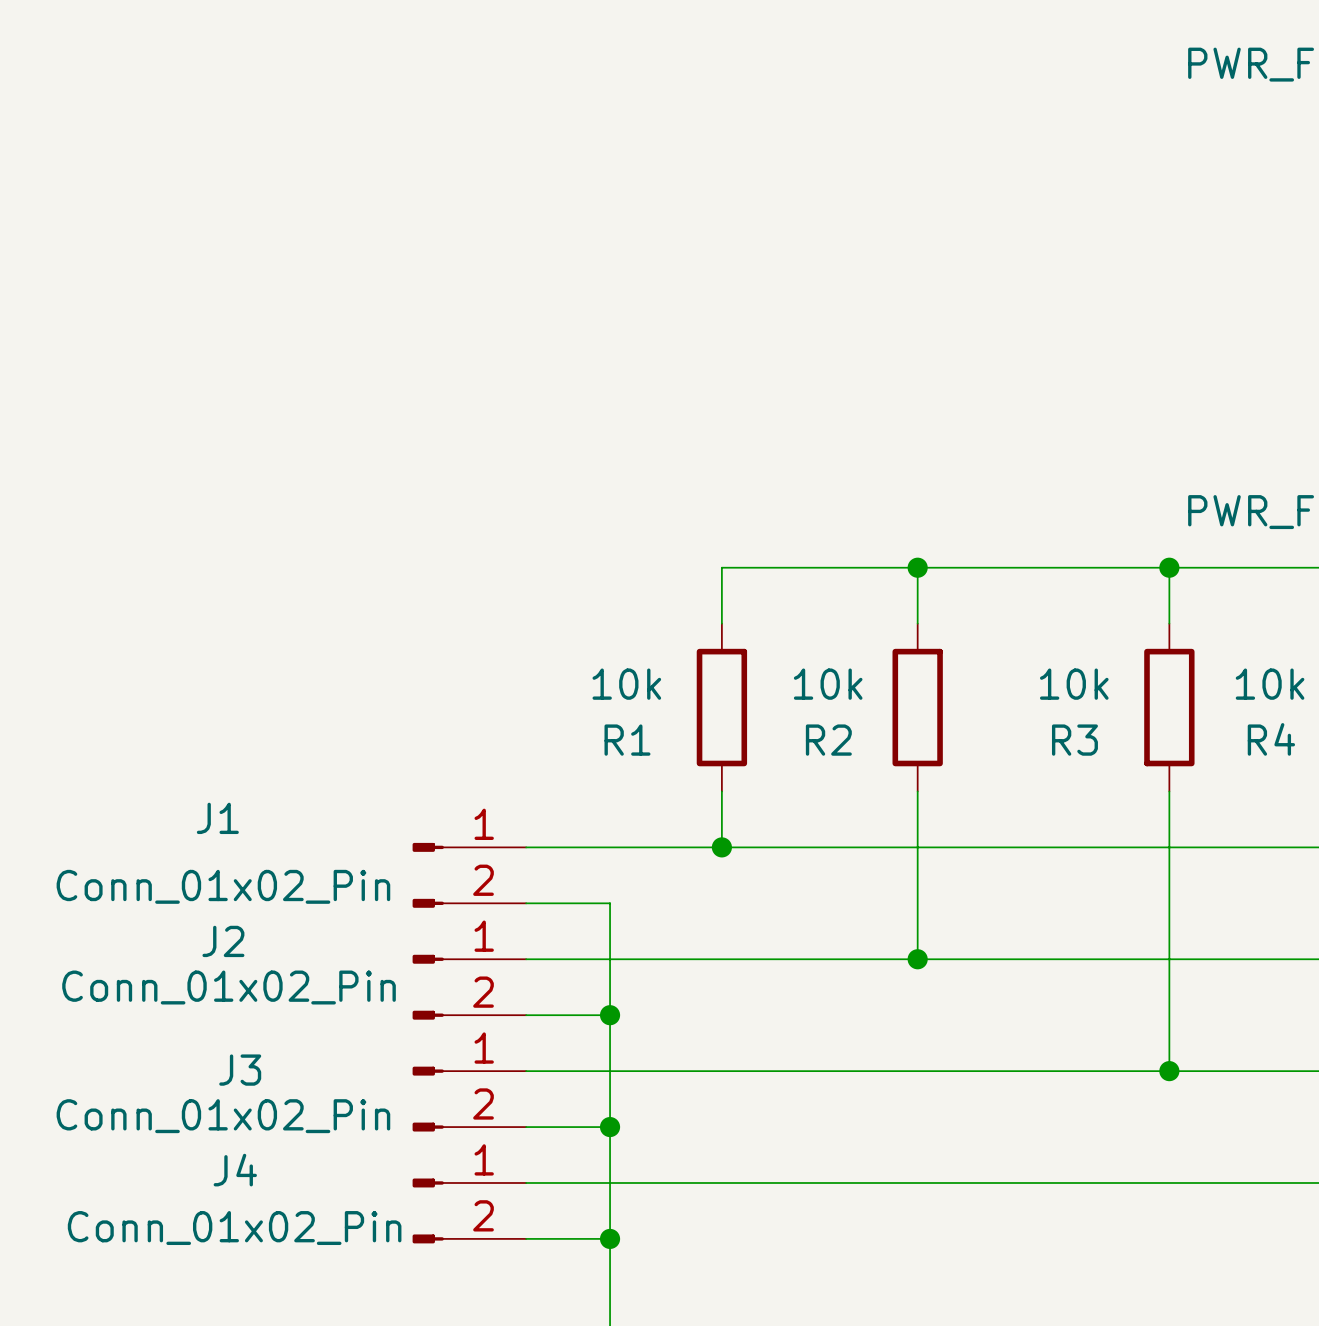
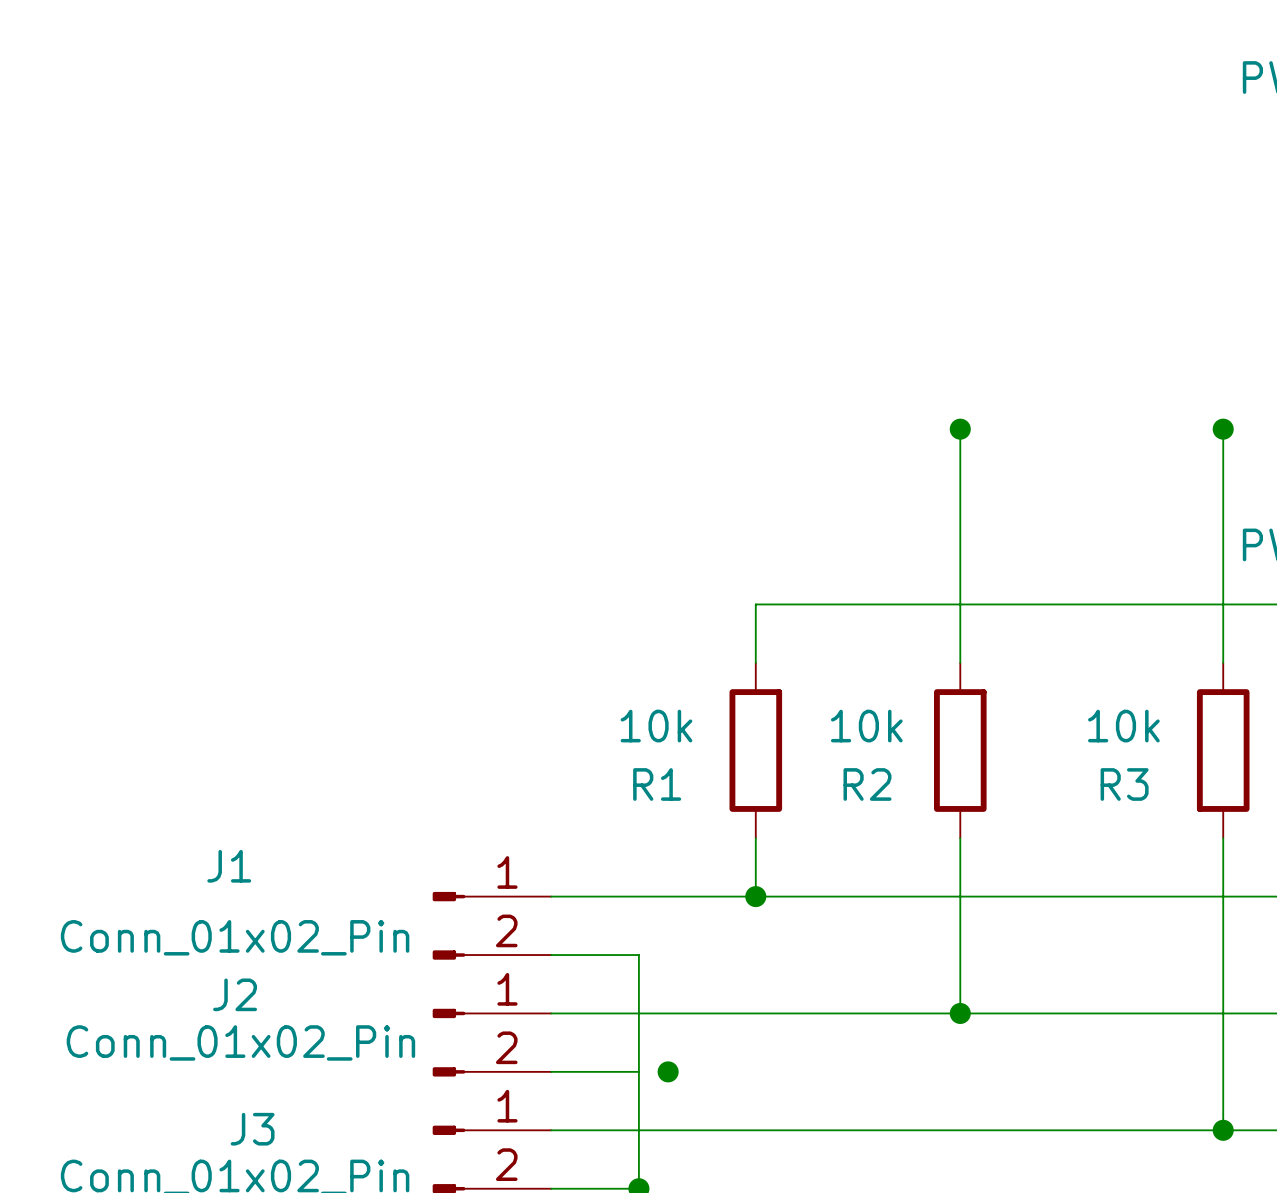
wire: none -> (960, 429) (960, 604)
junction: none -> (960, 429)
wire: none -> (1223, 429) (1223, 604)
junction: none -> (1223, 429)
junction: (917, 567) -> none
junction: (1169, 567) -> none
junction position: (610, 1015) -> (668, 1071)

